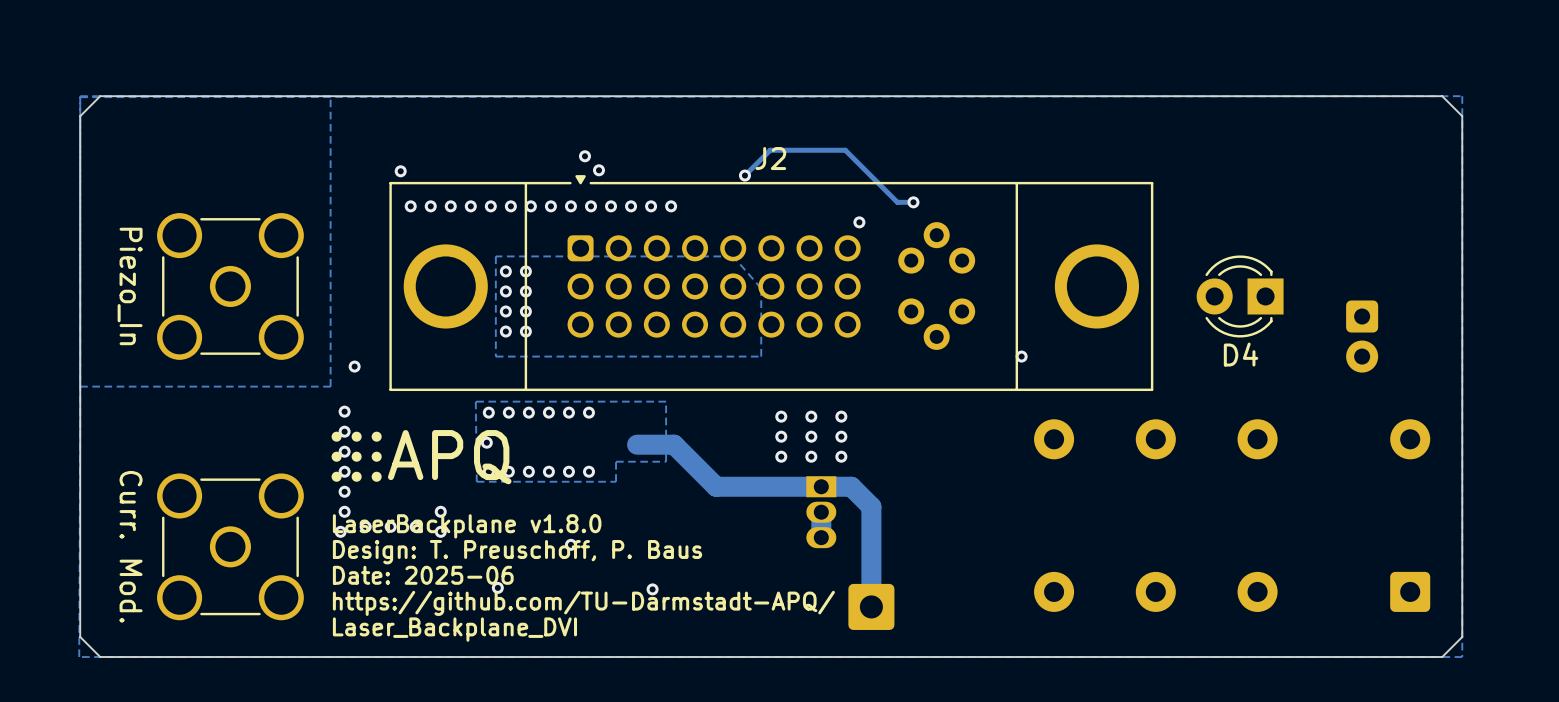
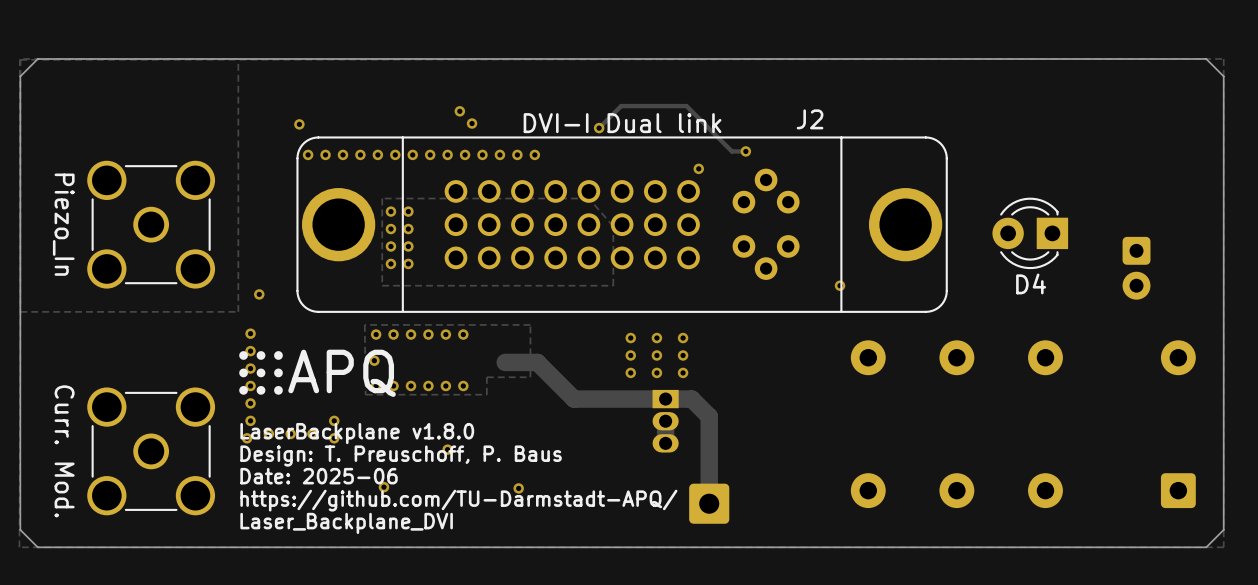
J2 name position: J2 (770, 158) -> J2 (810, 119)
J2 footprint: [389, 175, 1154, 392] -> [296, 136, 948, 313]

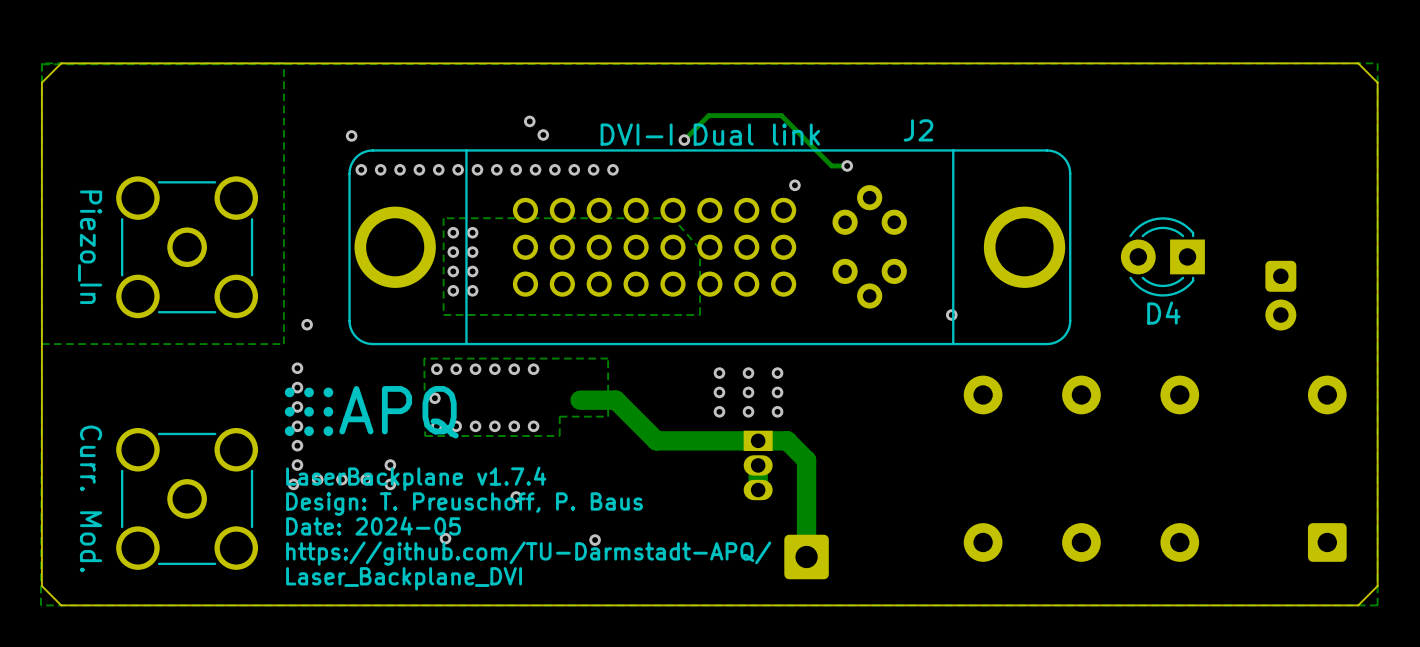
text: LaserBackplane v1.8.0 (357, 433) -> LaserBackplane v1.7.4 (416, 478)
text: Date: 2025-06 (319, 476) -> Date: 2024-05 (373, 526)

